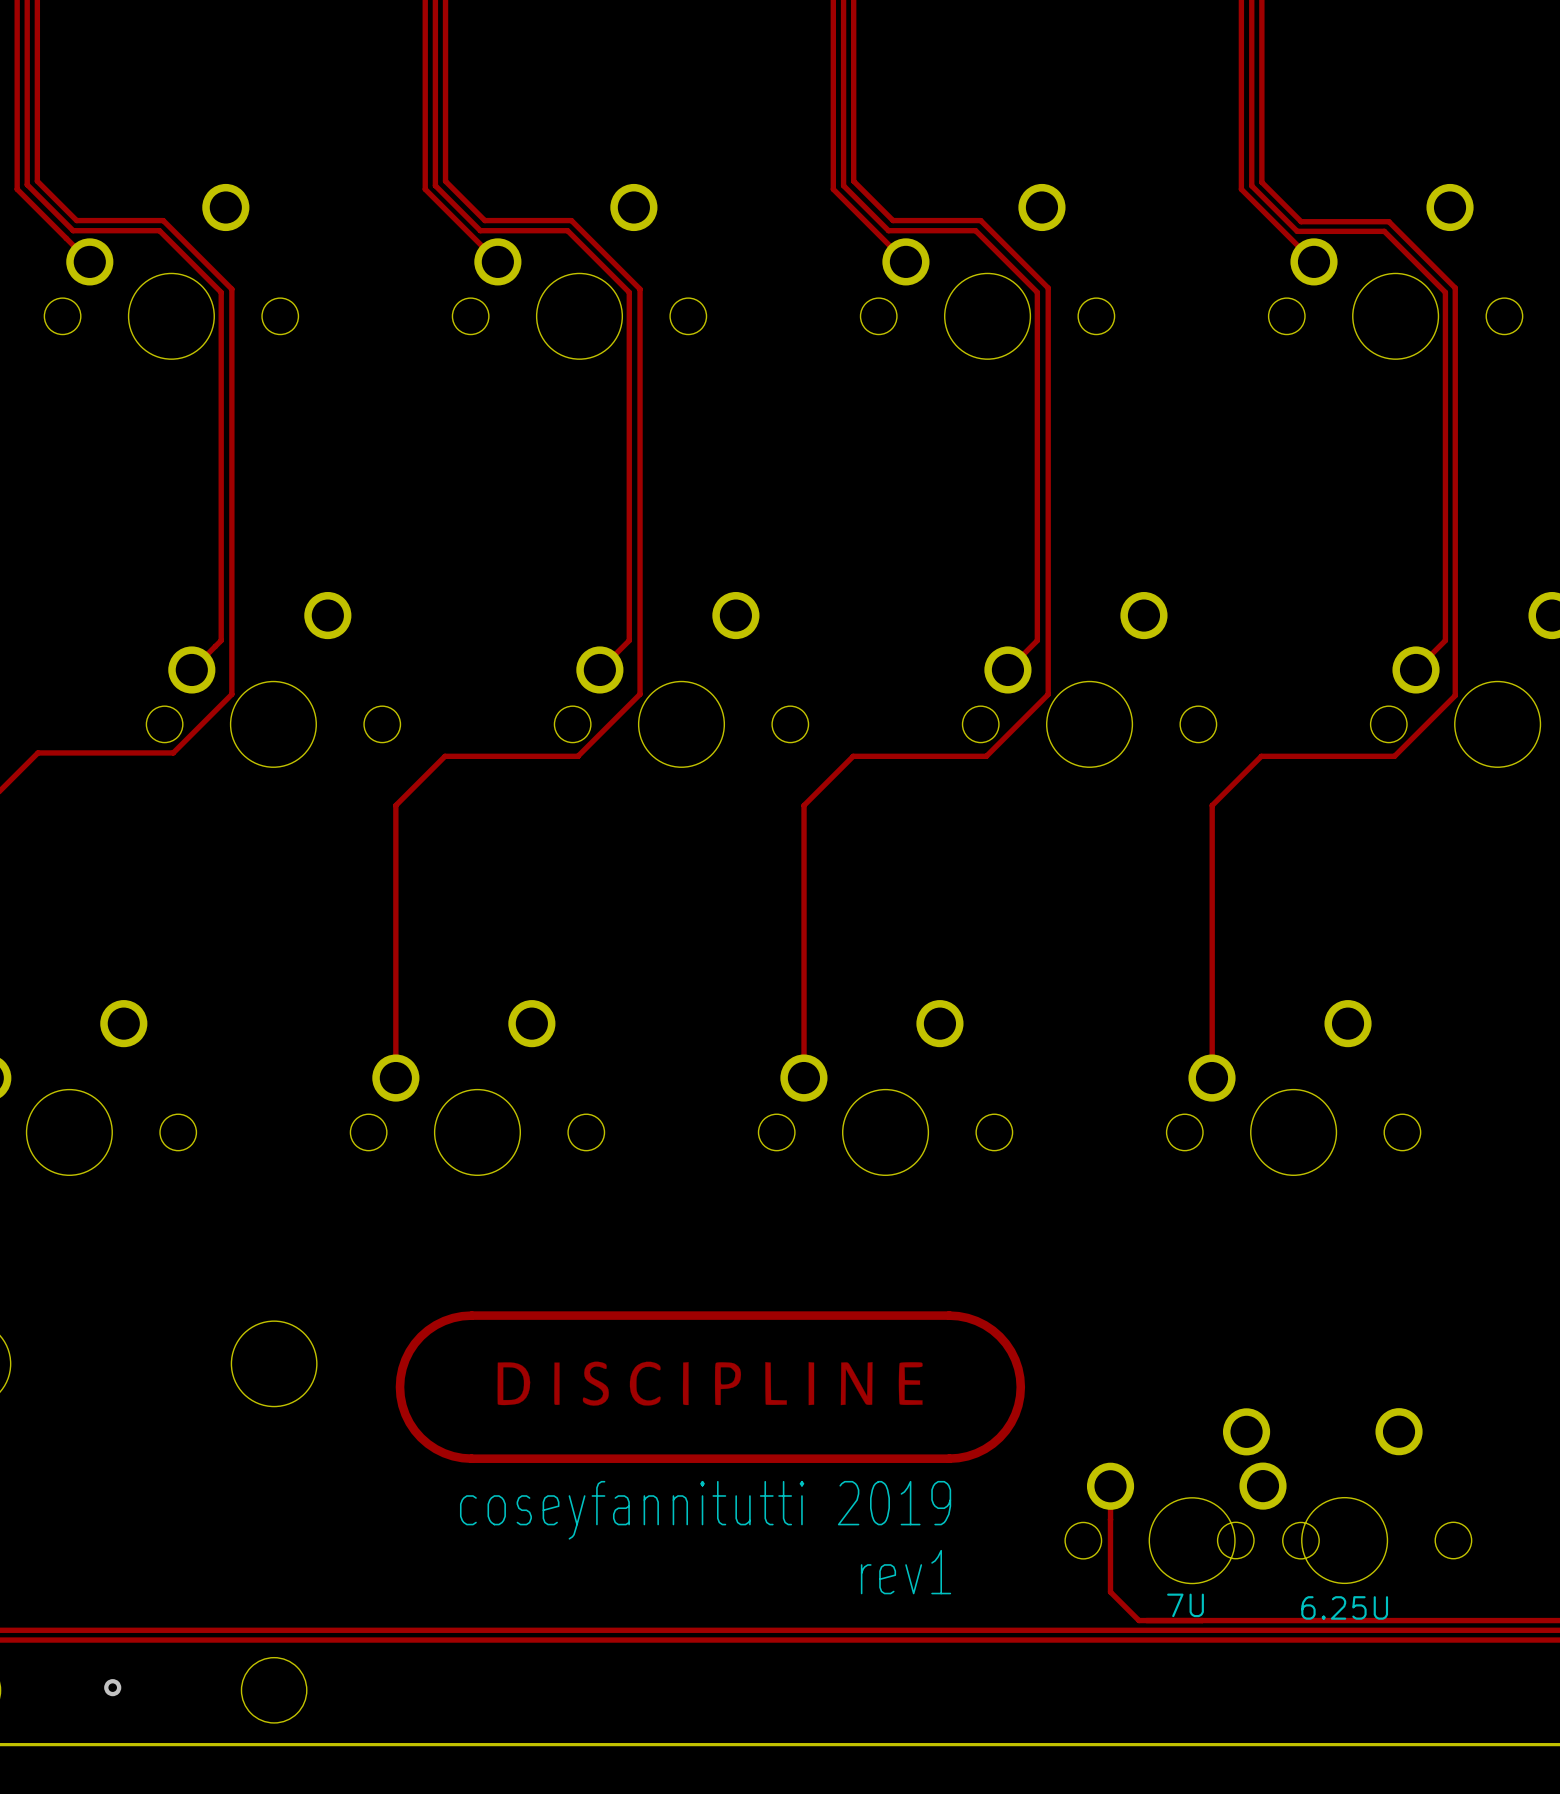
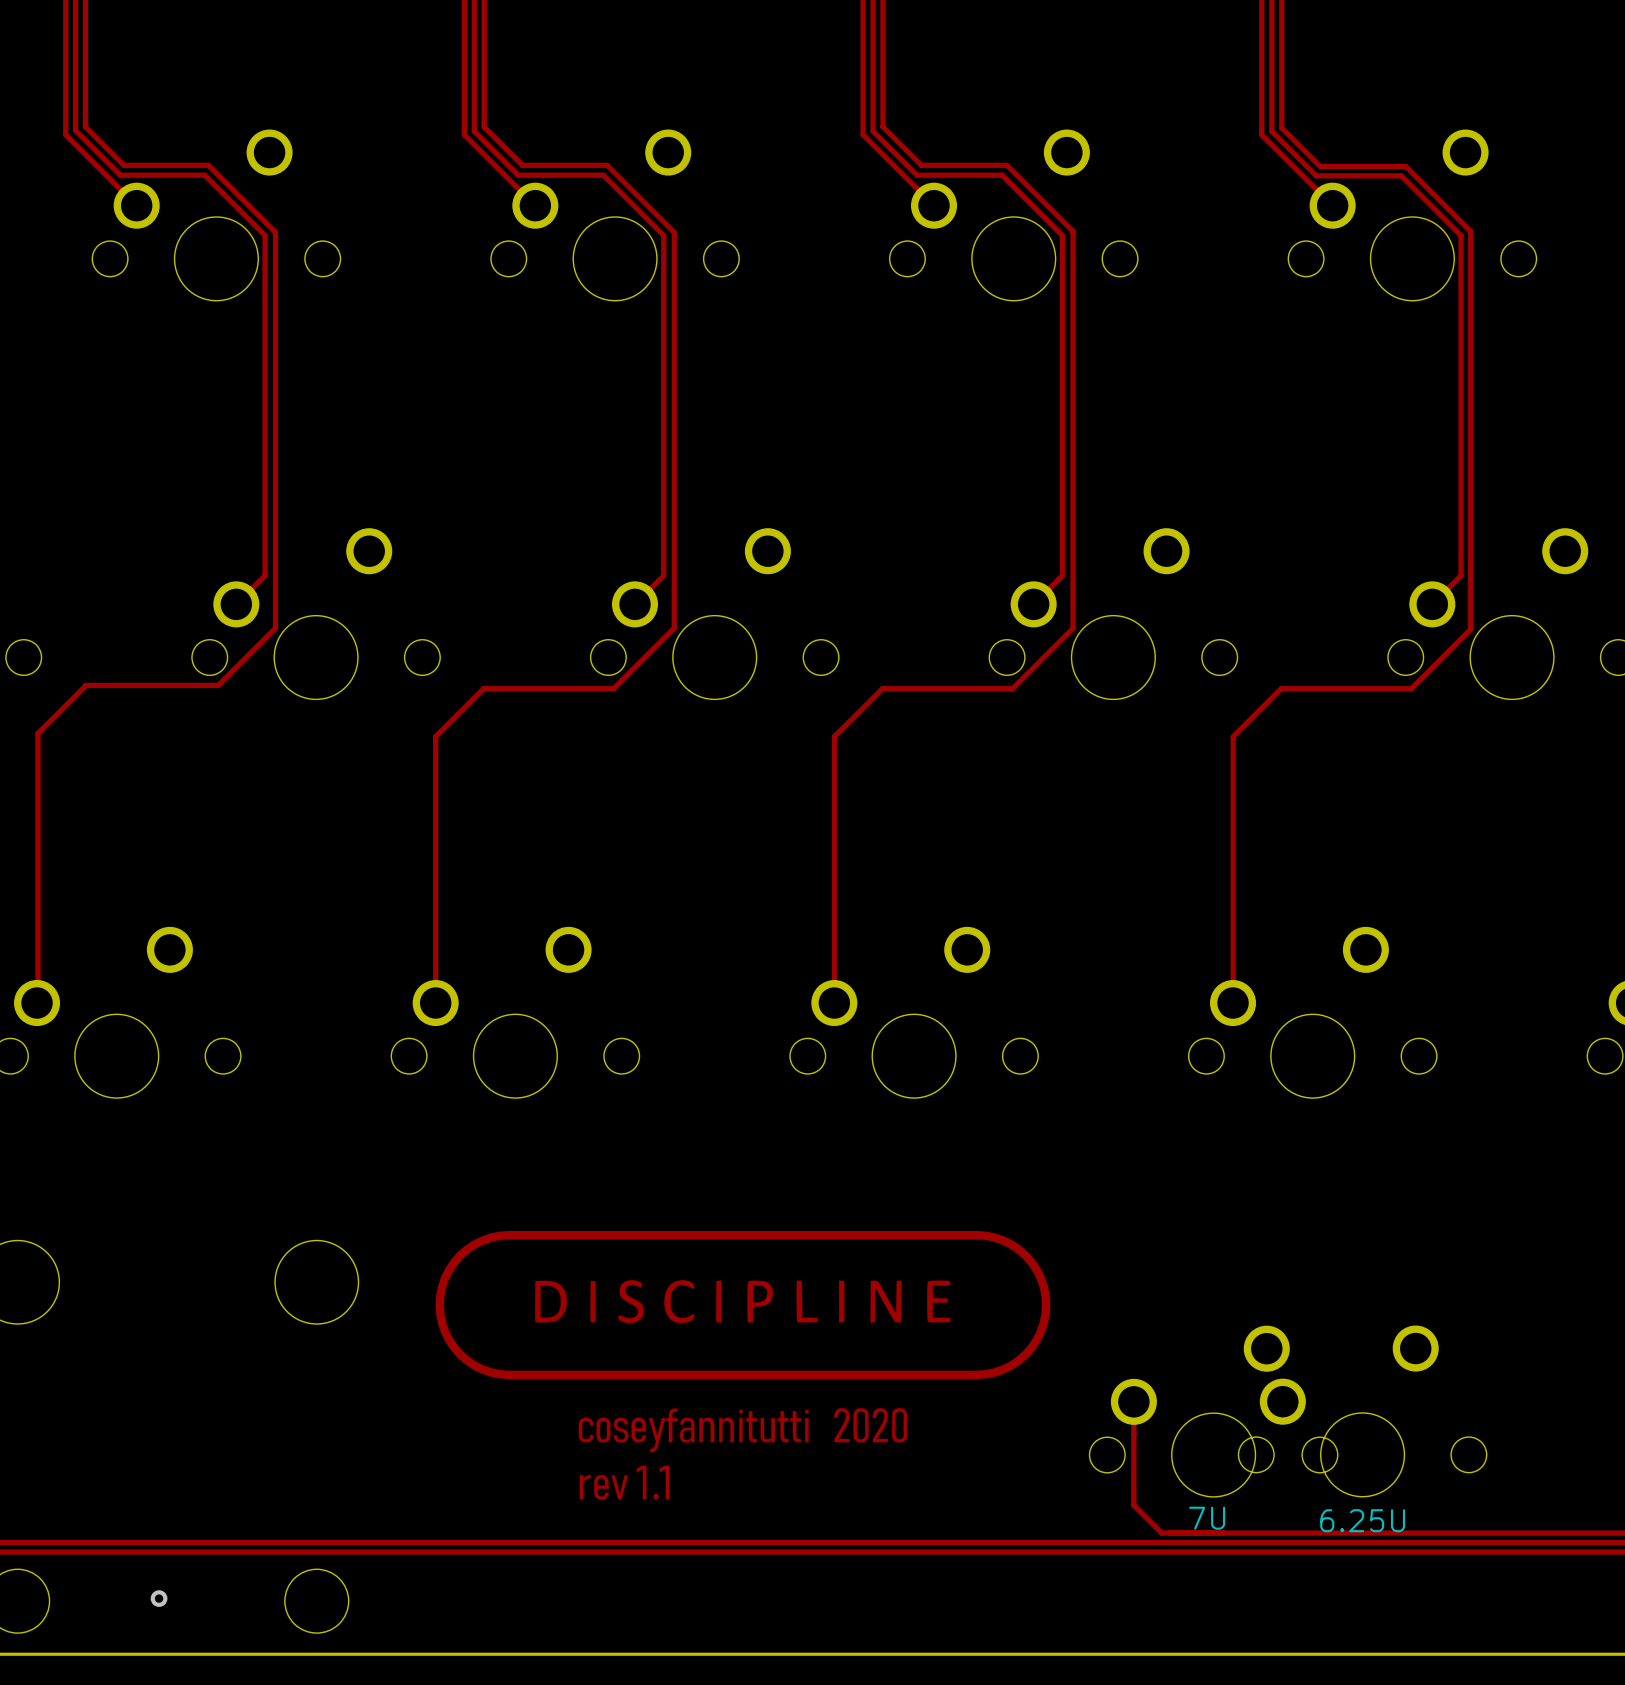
drawing: none -> [578, 1408, 908, 1500]
text: coseyfannitutti 2019 (705, 1510) -> none
text: rev1 (906, 1572) -> none

